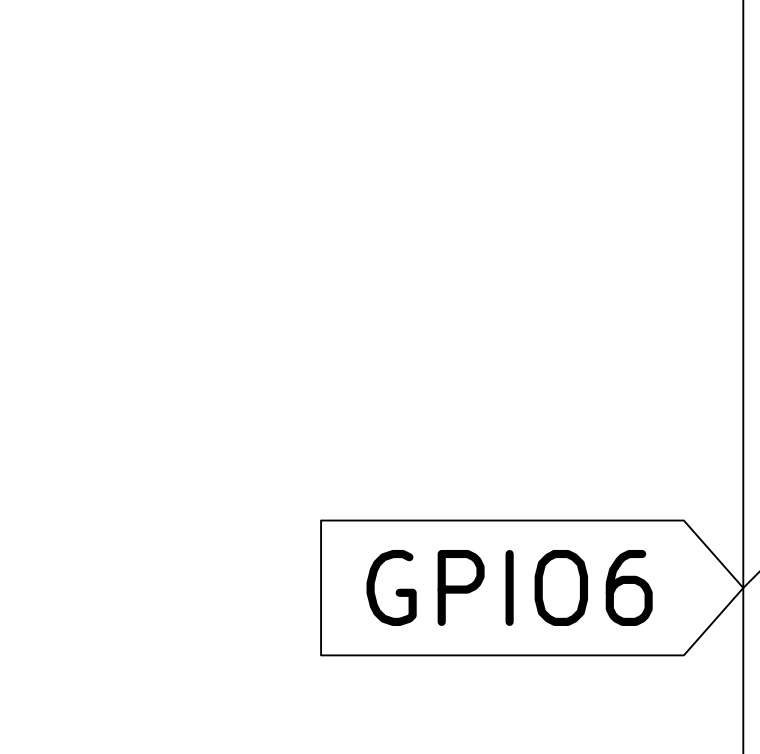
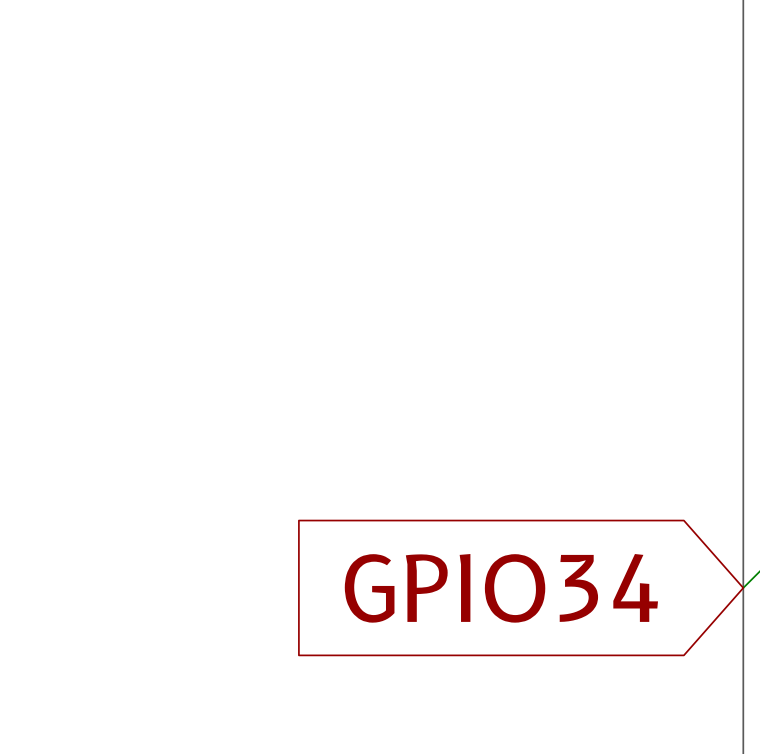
global label: GPIO6 (509, 587) -> GPIO34 (501, 588)

